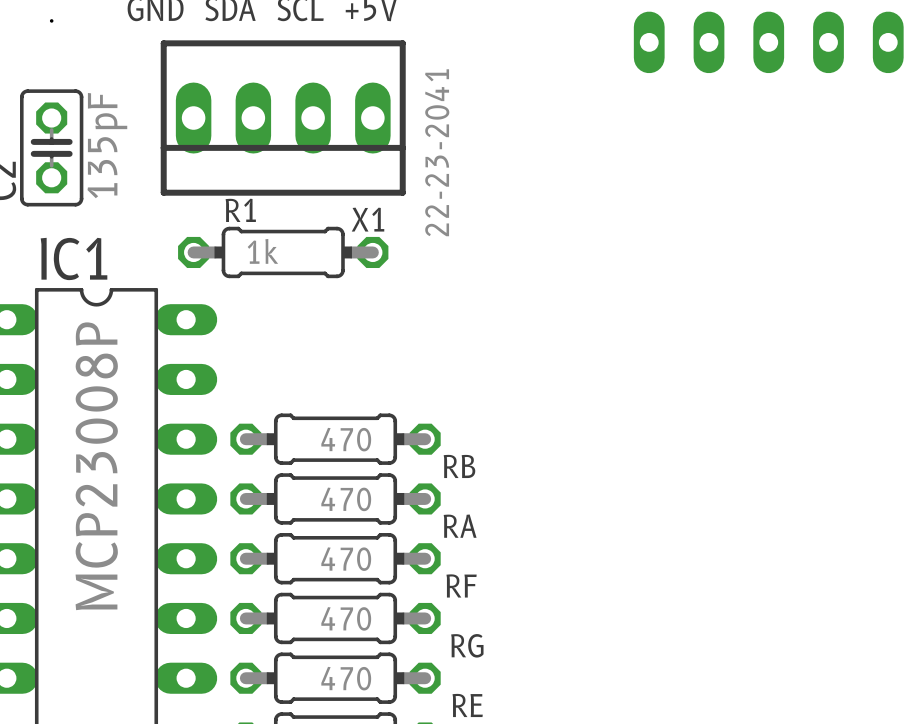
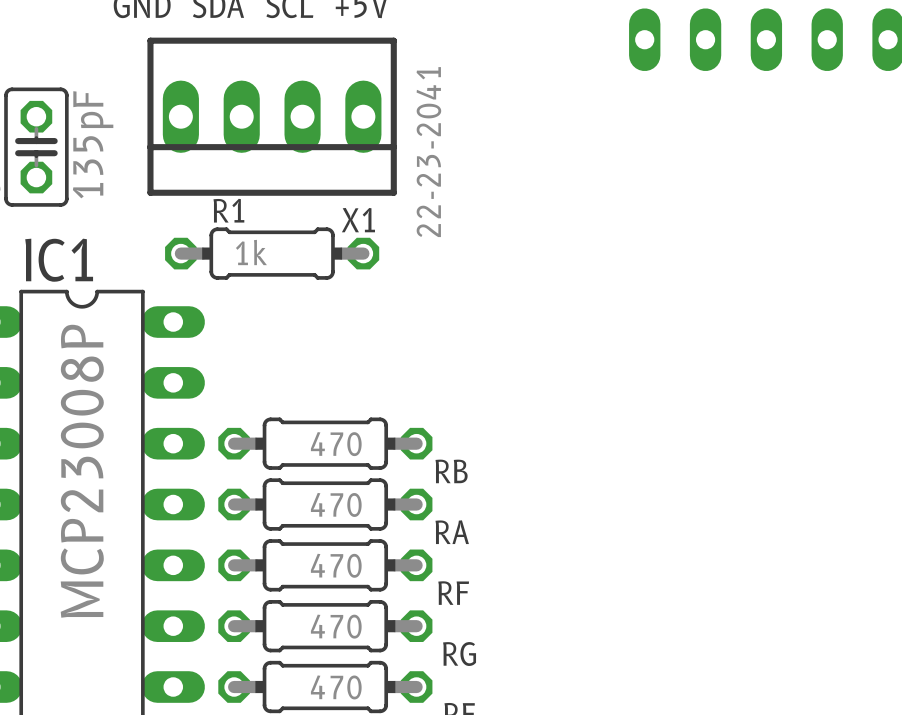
hole: (51, 20) -> none

